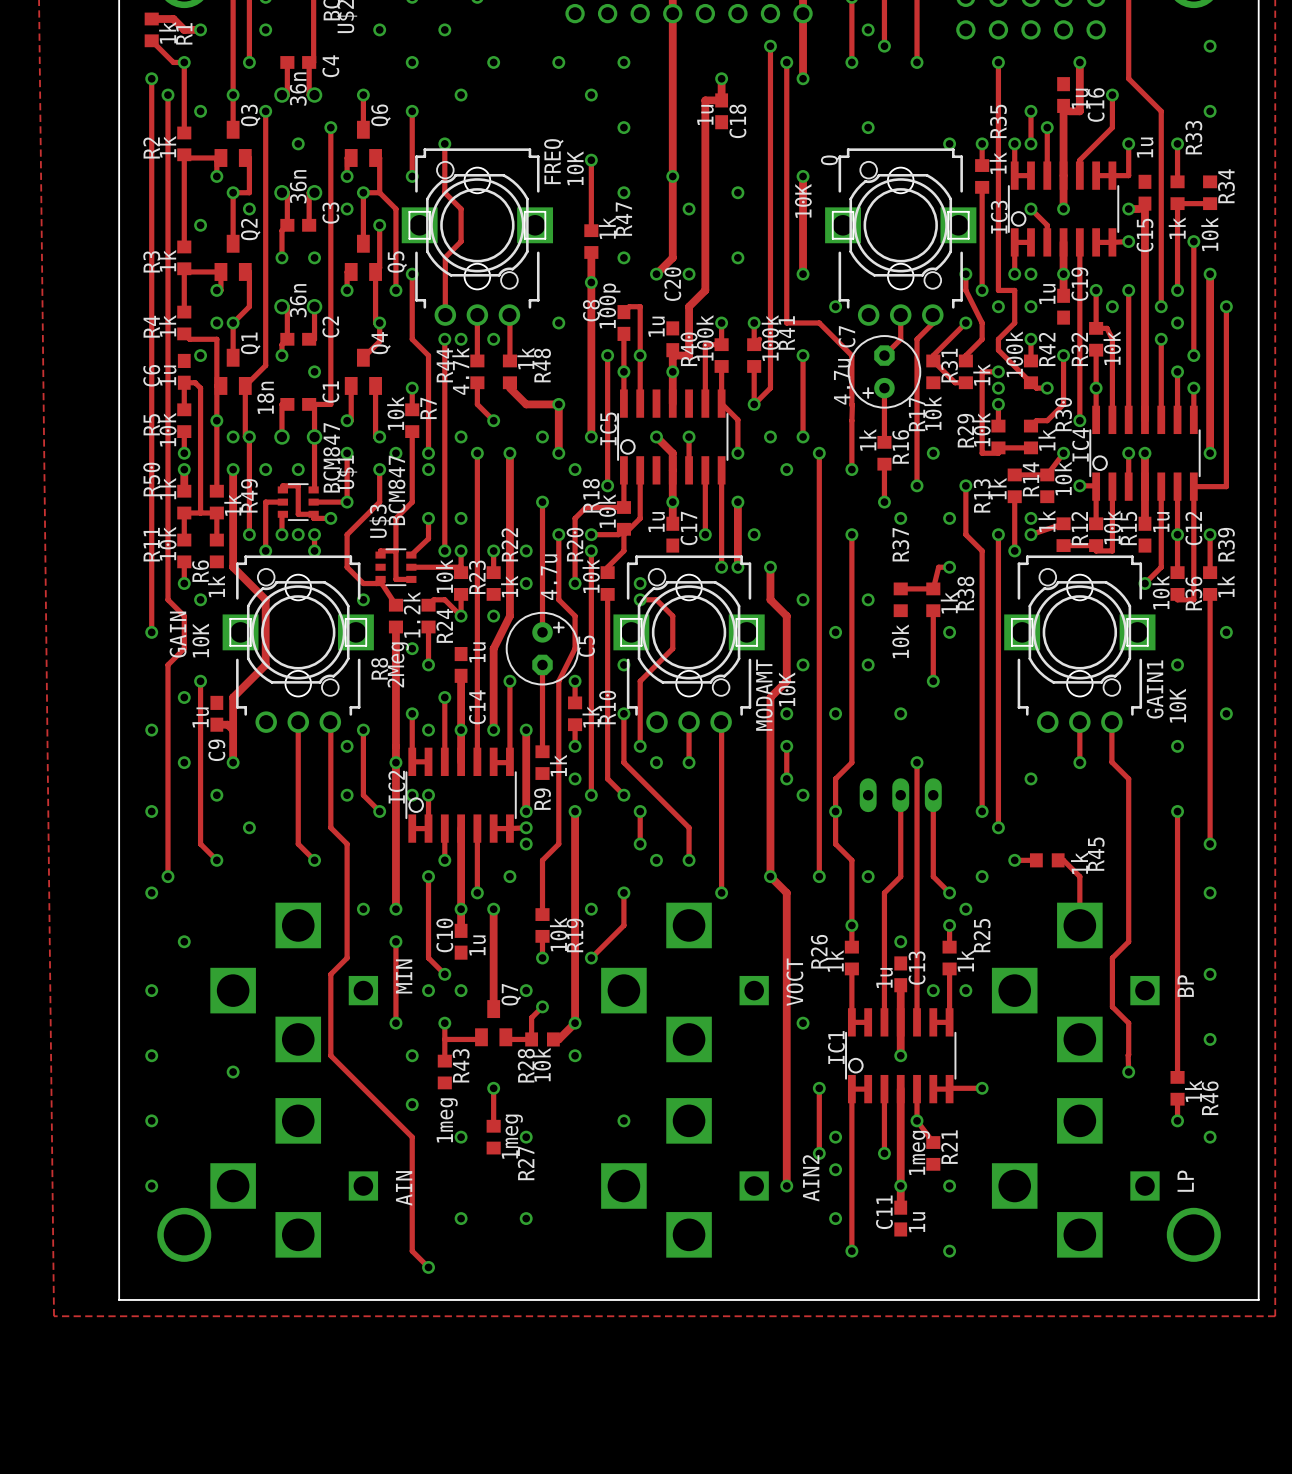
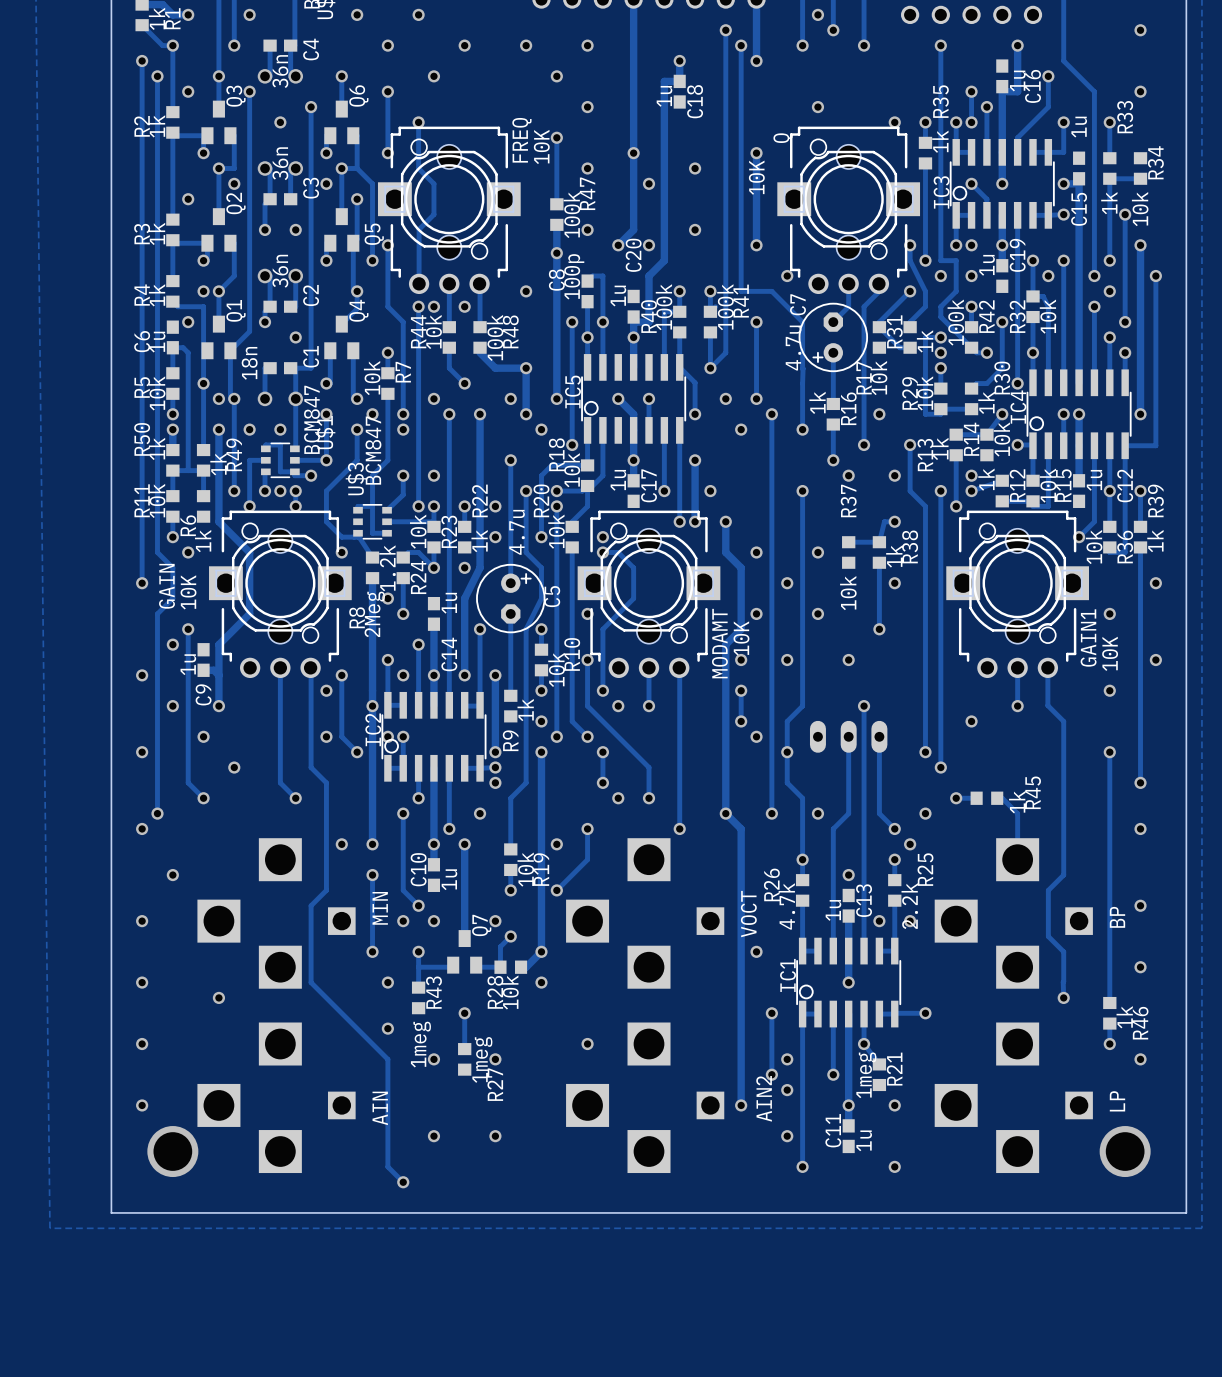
R47 value: 1k (607, 228) -> 100k (571, 215)
R48 value: 1k (525, 358) -> 100k (495, 337)
R44 value: 4.7k (460, 371) -> 10k (433, 331)
R10 value: 1k (591, 716) -> 10k (556, 669)
R26 value: 1k (835, 960) -> 4.7k (786, 906)
R25 value: 1k (965, 960) -> 2.2k (909, 906)

